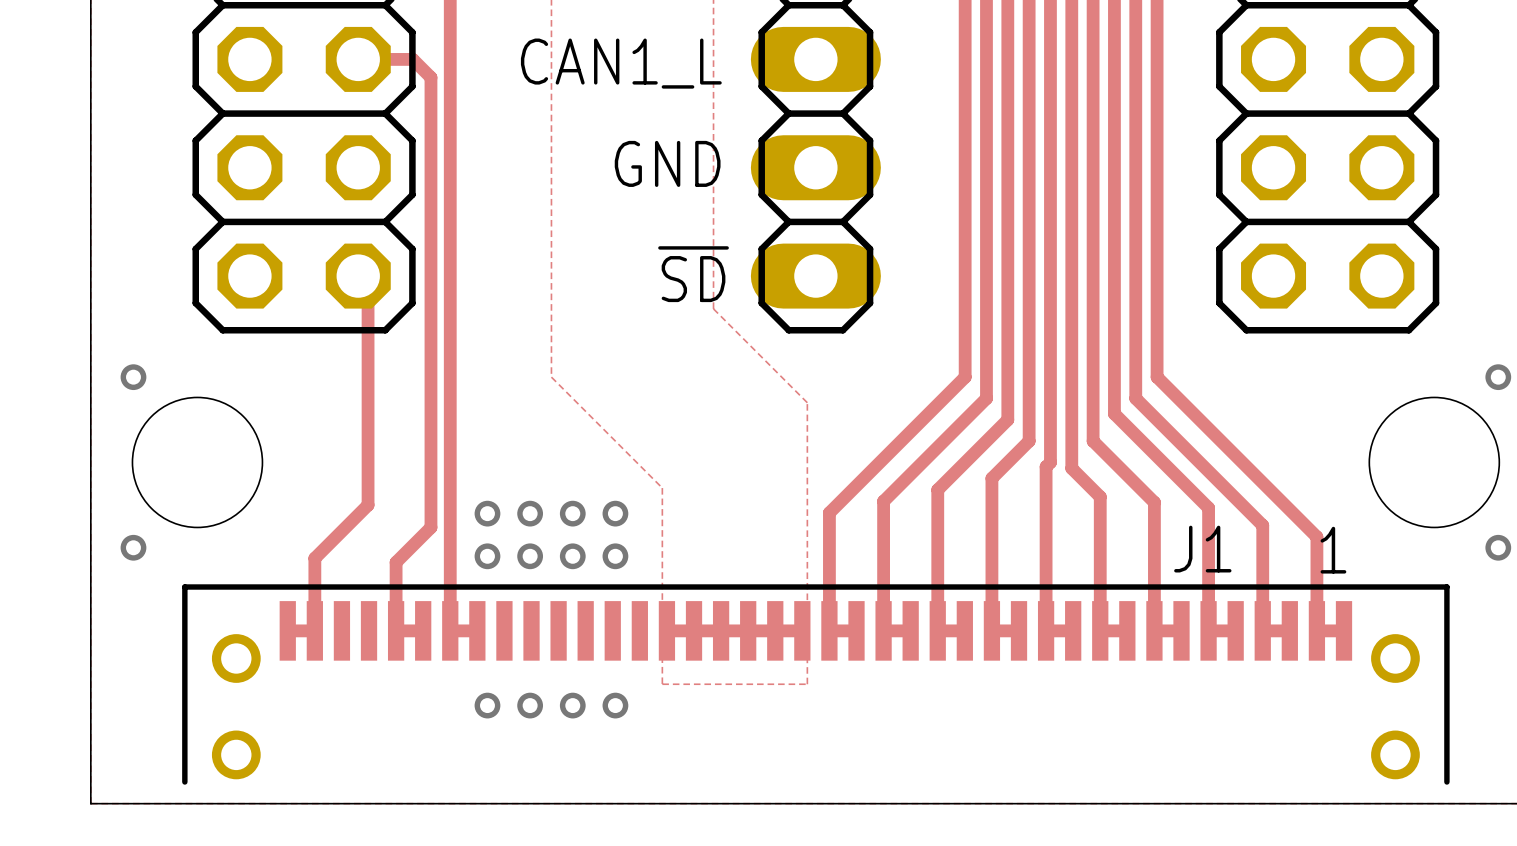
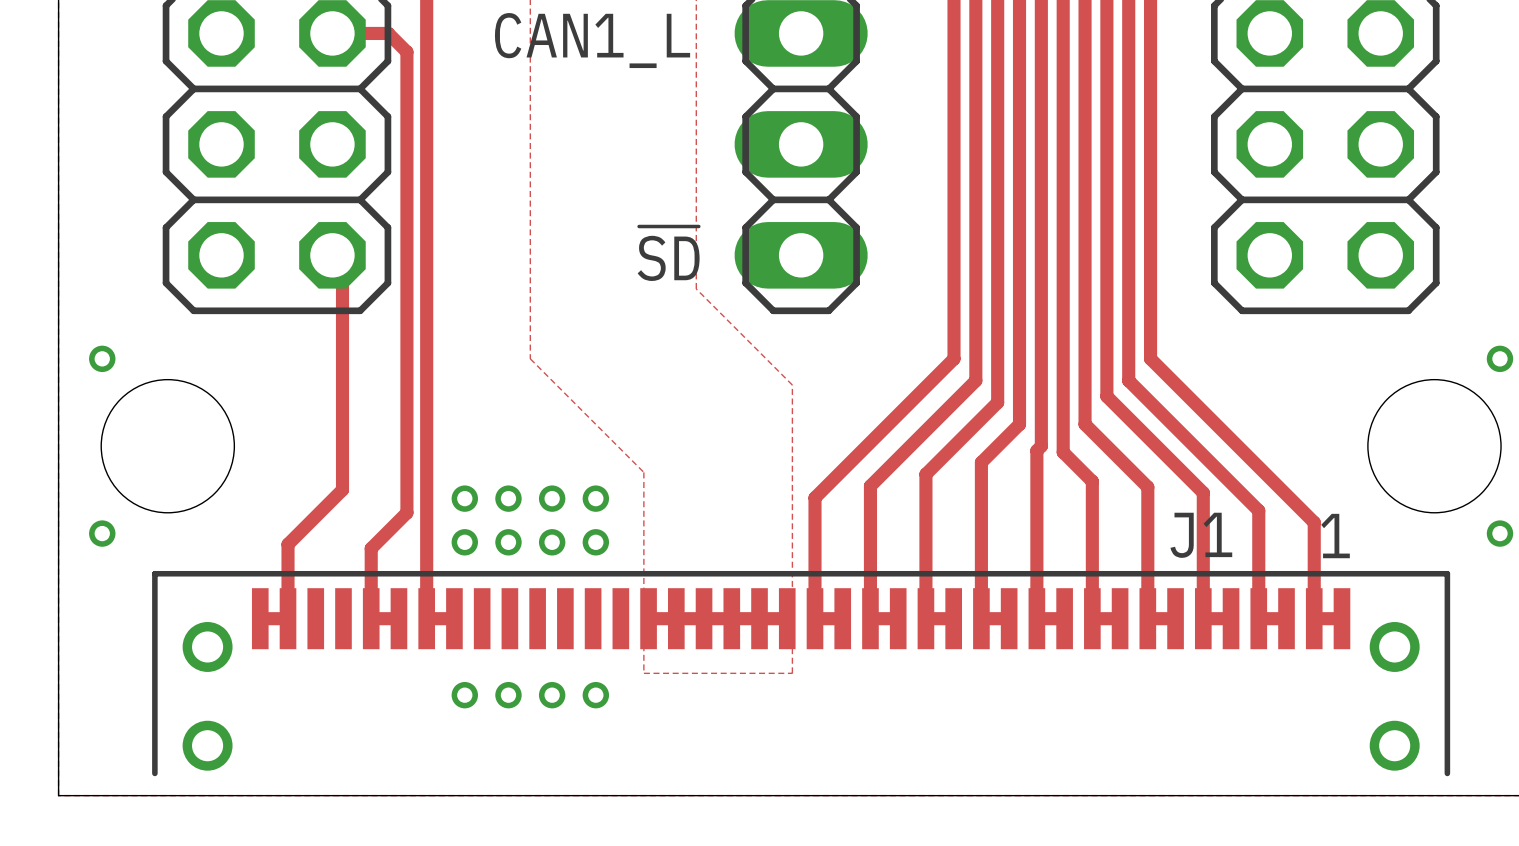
text: GND (667, 163) -> none

